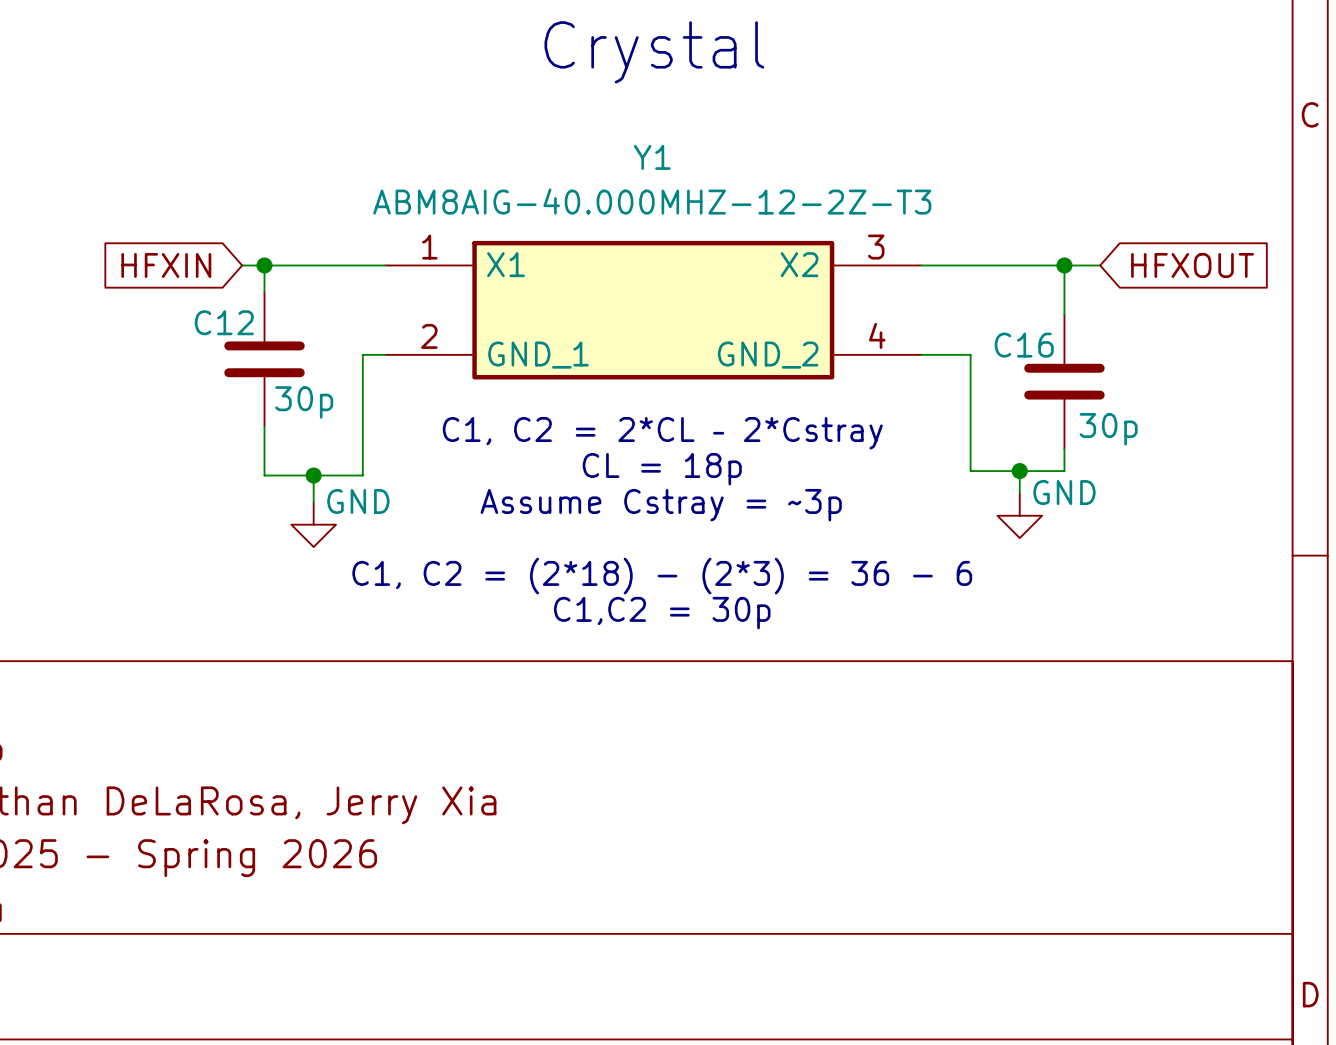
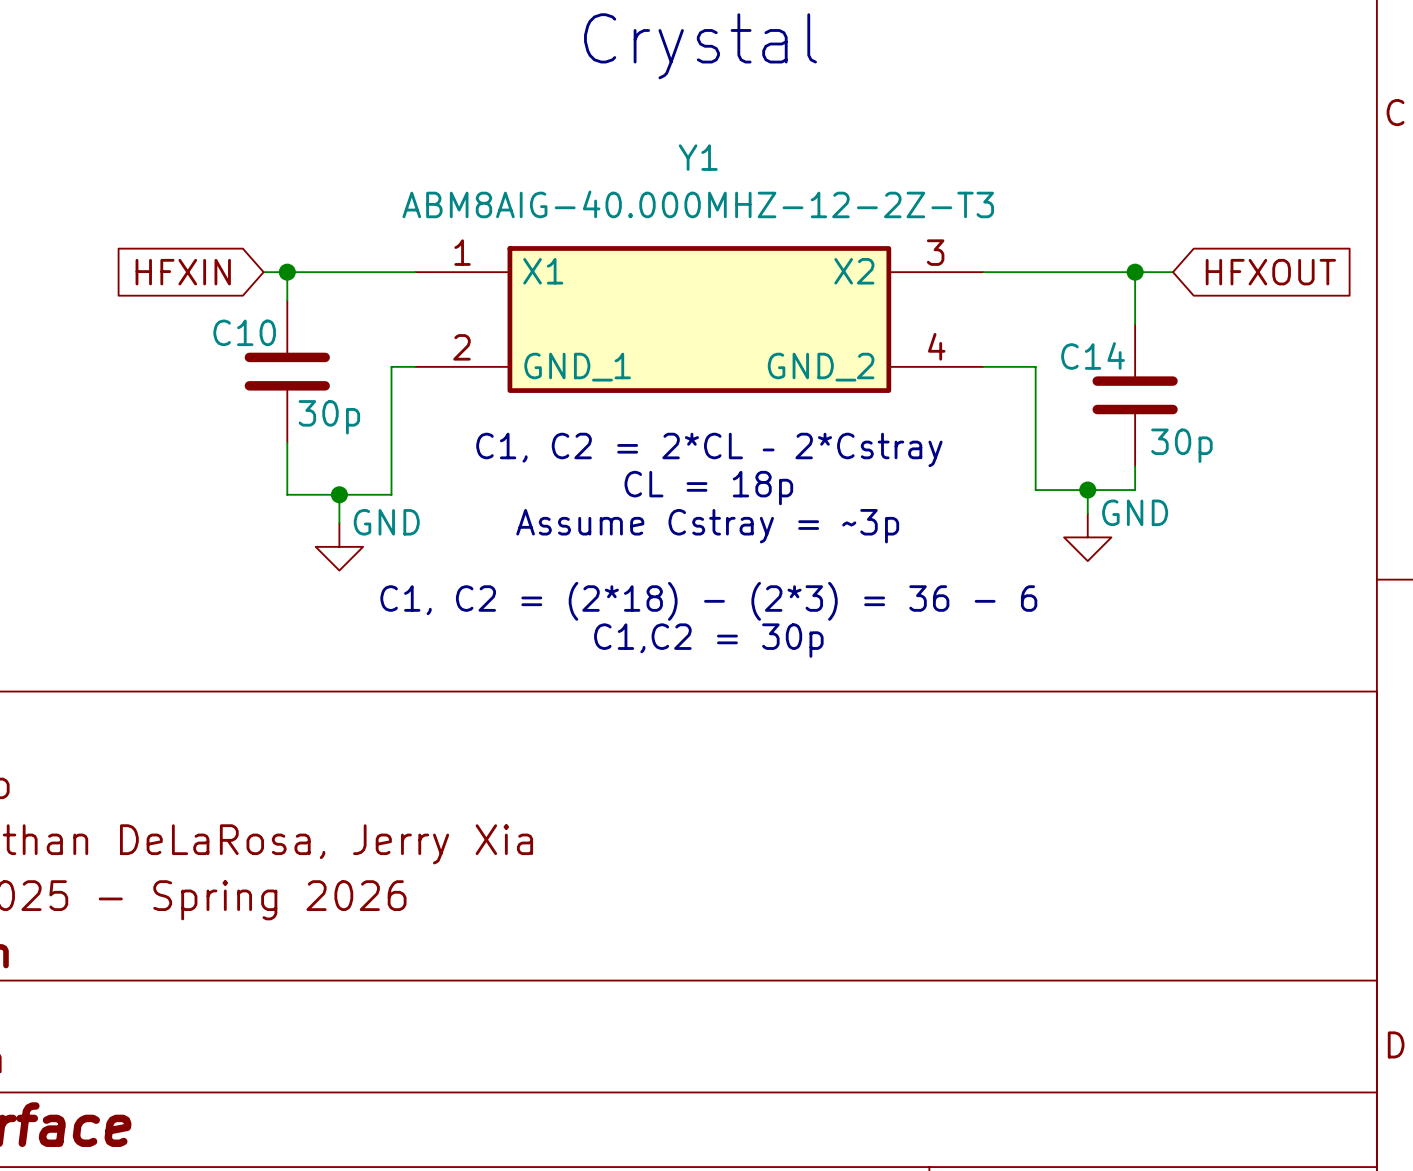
C12 name: C12 (224, 322) -> C10 (244, 332)
C16 name: C16 (1024, 345) -> C14 (1093, 355)

